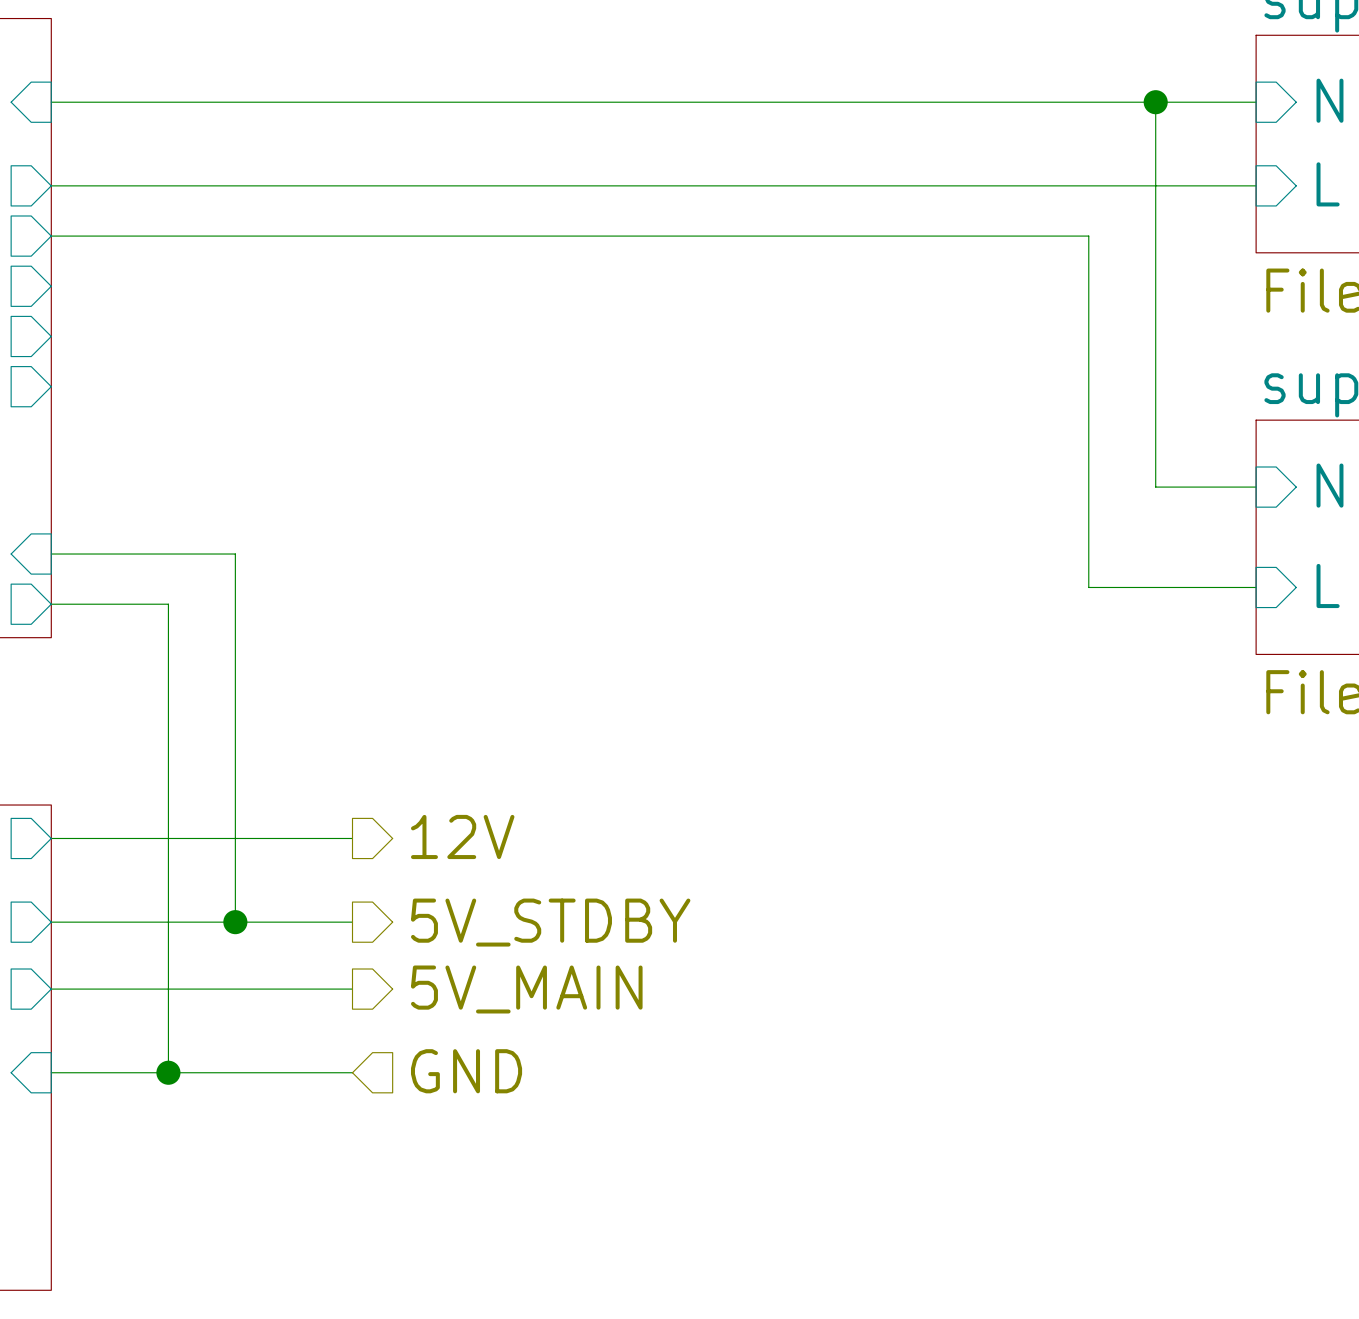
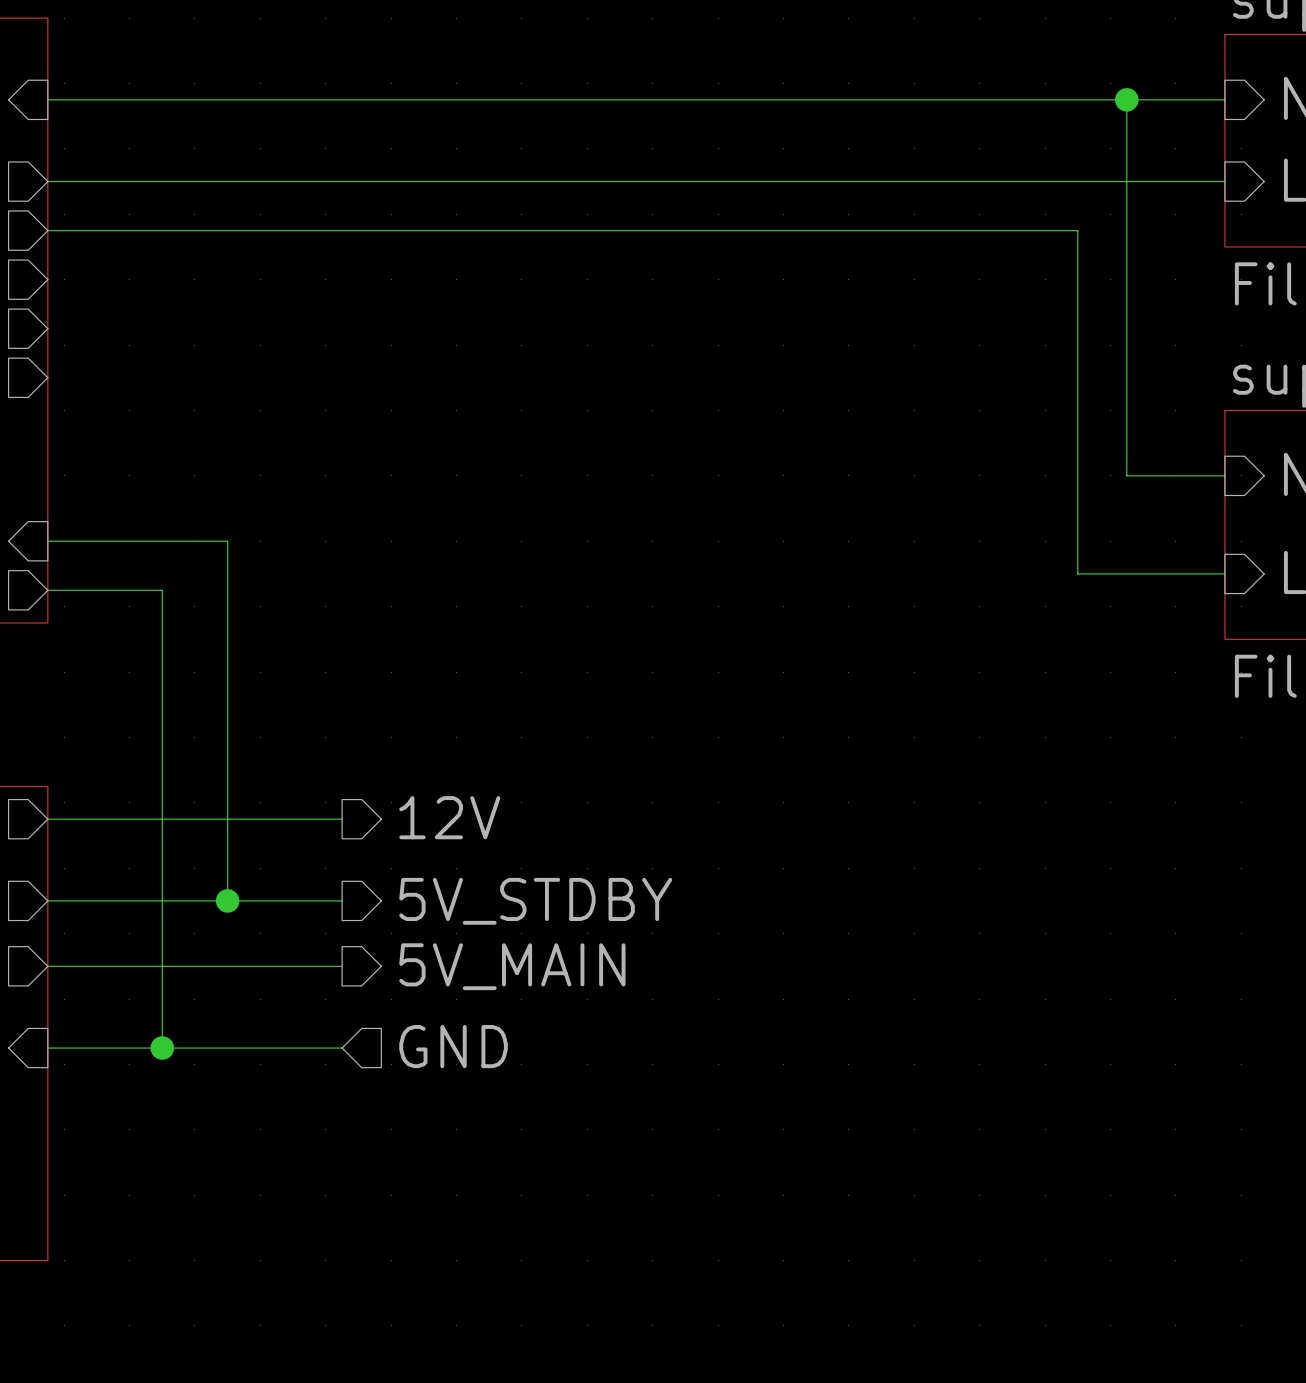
wire: (1088, 236) (1088, 587) (1105, 587) -> (1061, 230) (1077, 230) (1077, 573)

